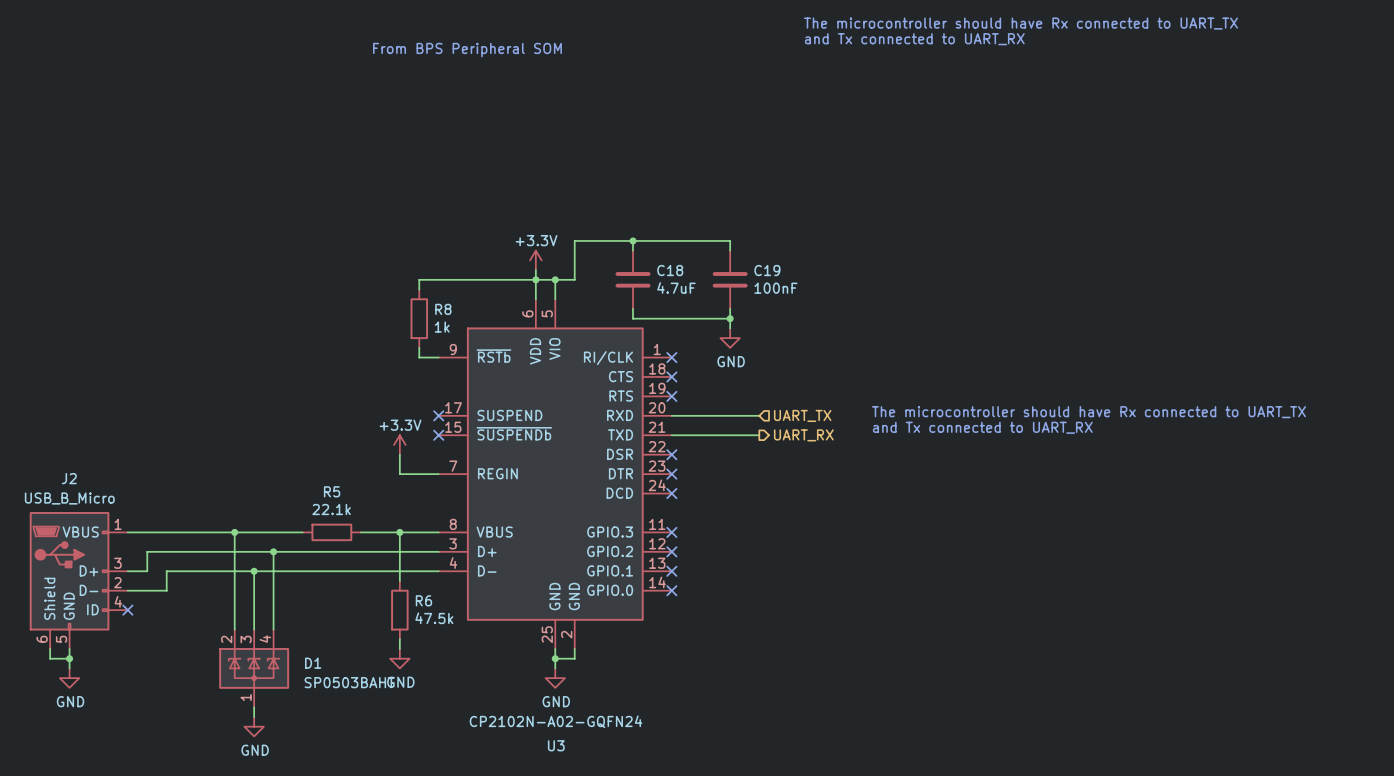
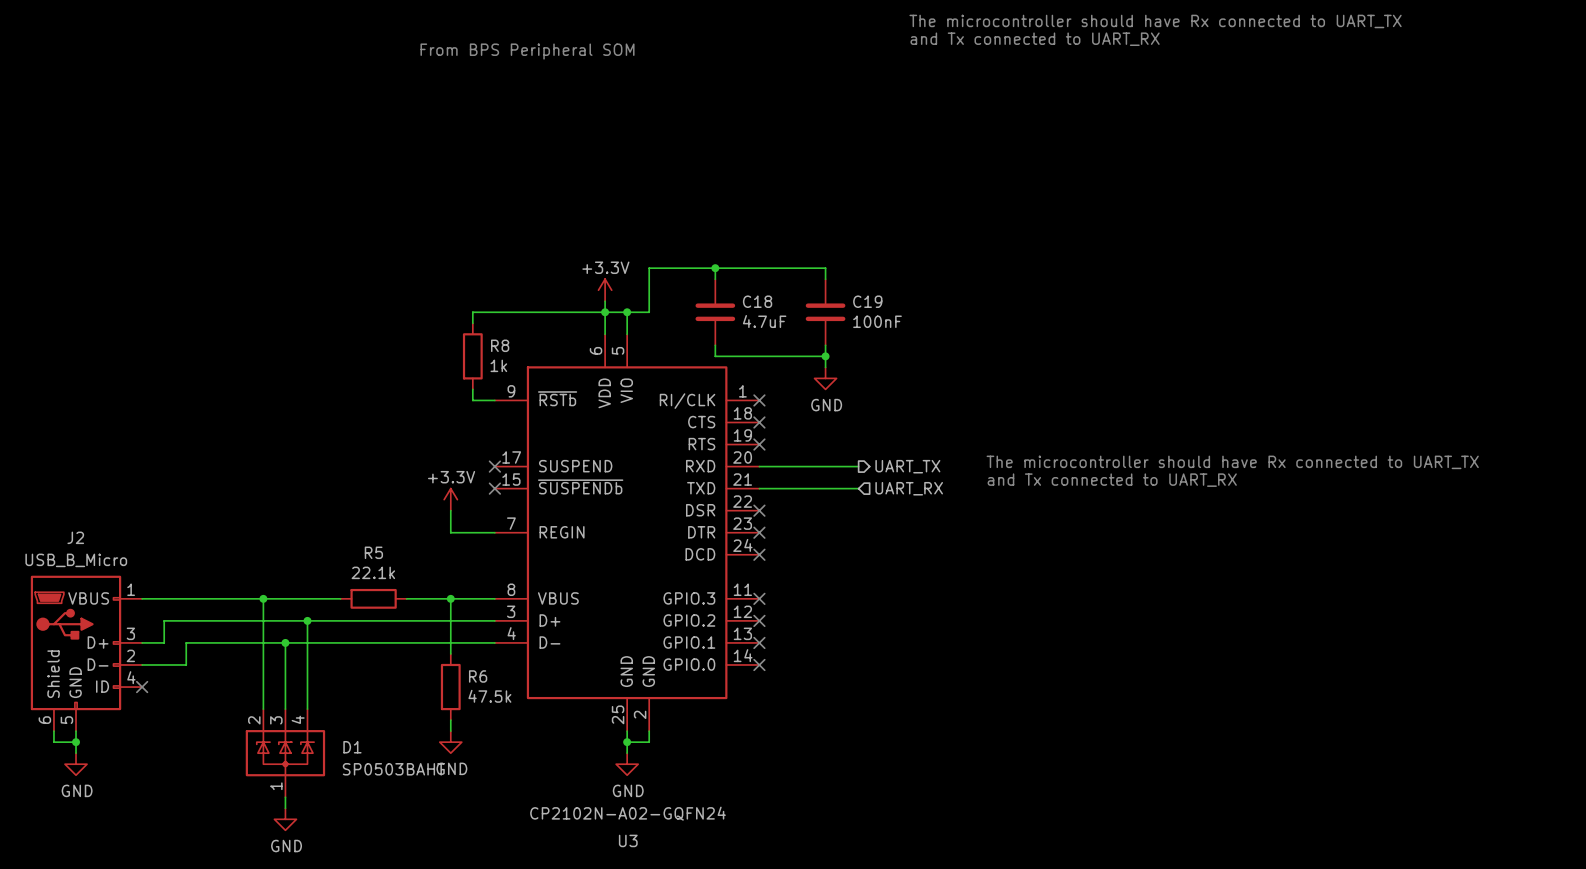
hierarchical label shape: input (802, 415) -> output (907, 466)
hierarchical label shape: output (803, 435) -> input (909, 488)

